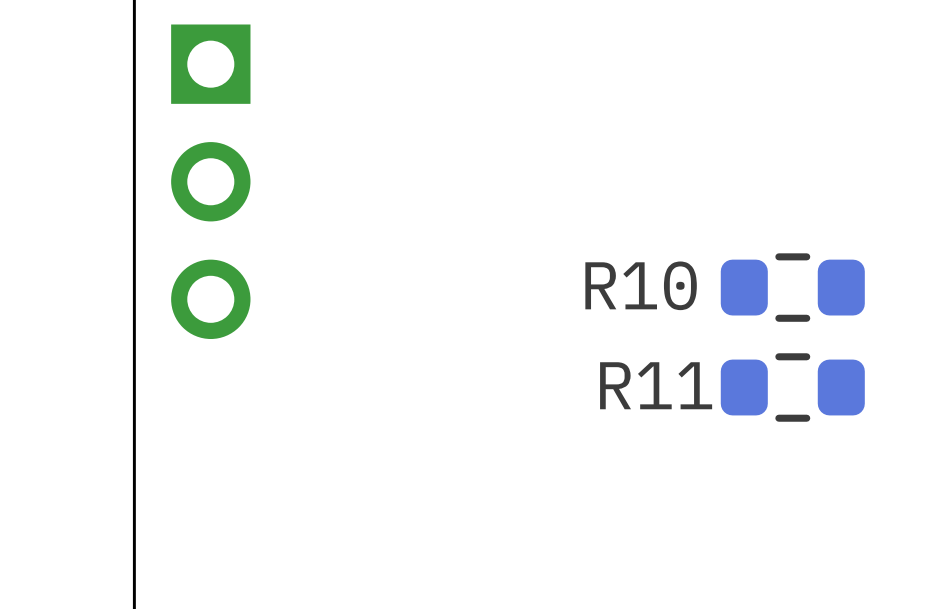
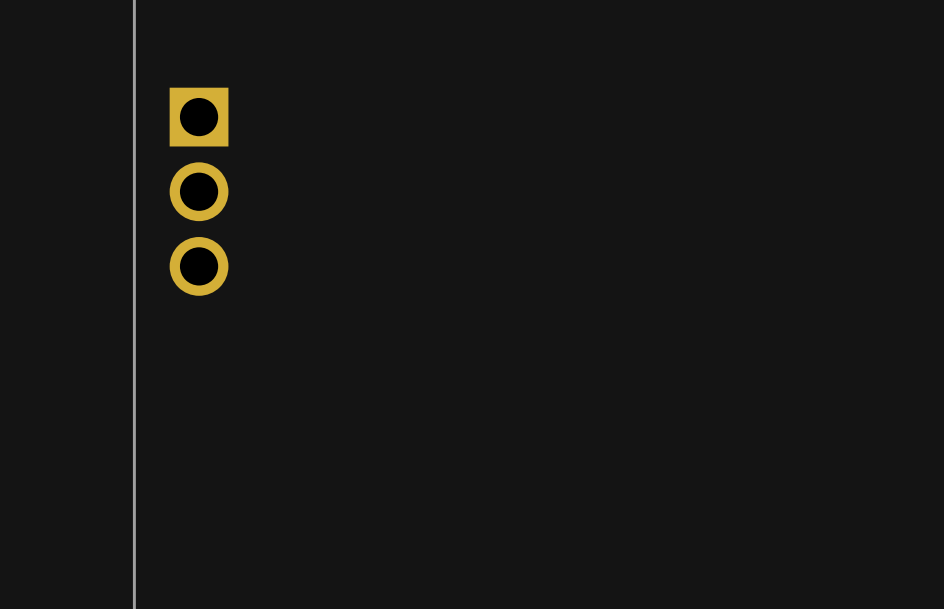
part footprint: [171, 24, 251, 340] -> [169, 87, 229, 296]
R10: (792, 287) -> none
R11: (792, 387) -> none

